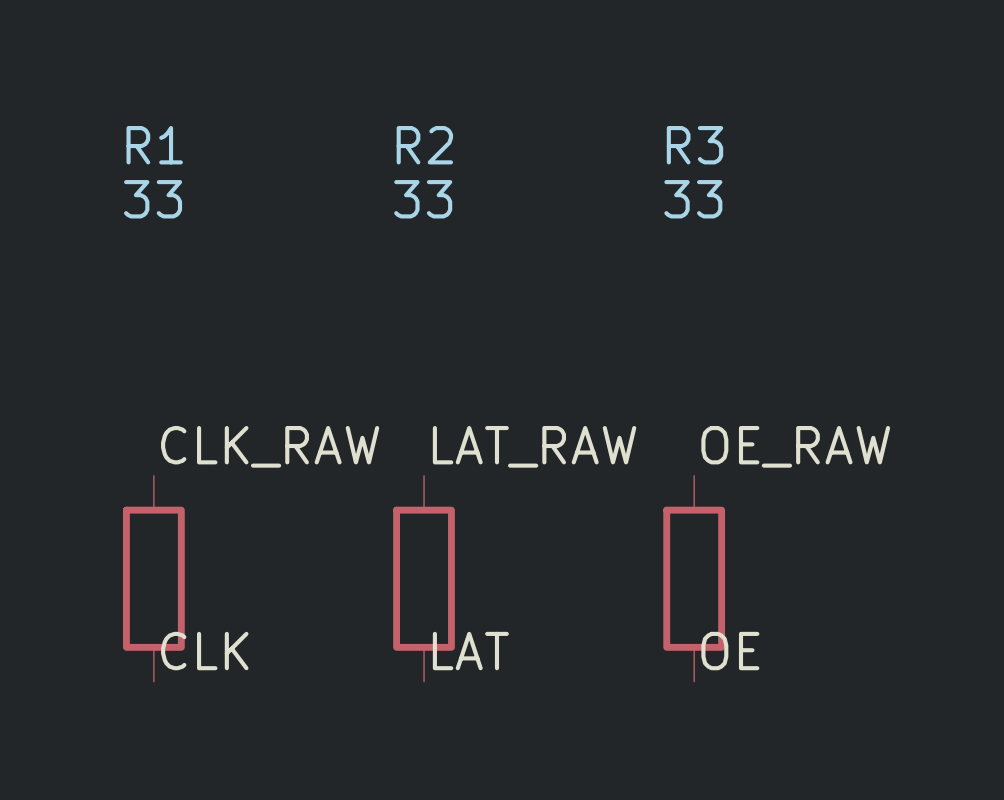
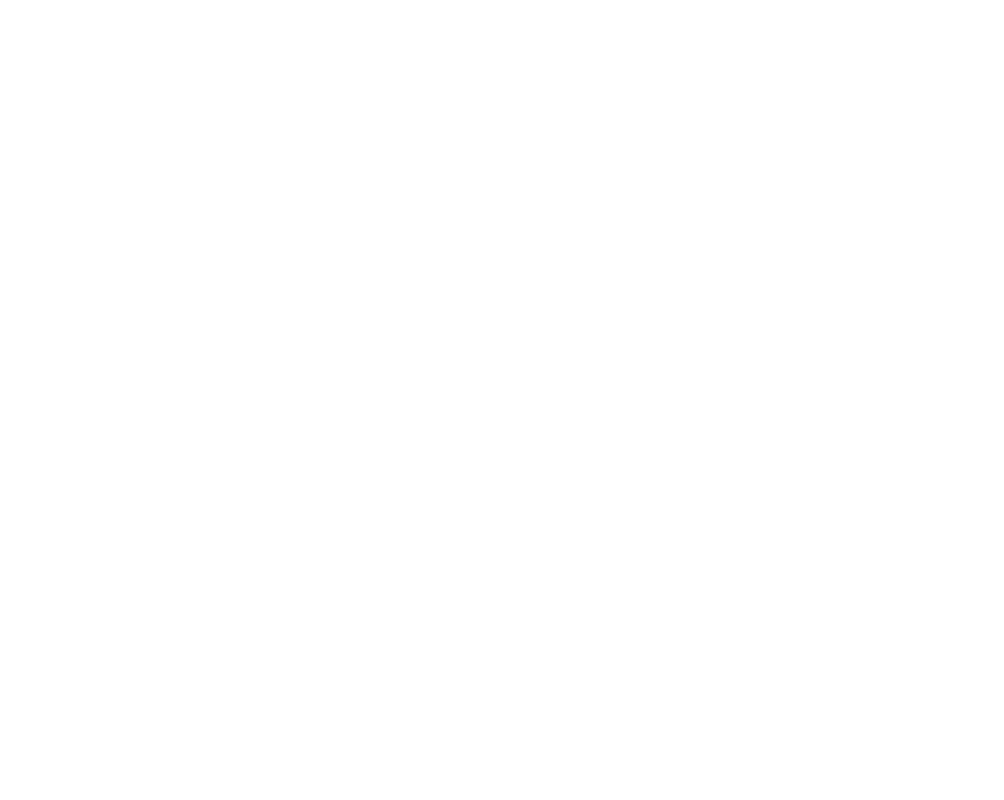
label: CLK_RAW (270, 446) -> none
label: LAT_RAW (534, 446) -> none
label: OE_RAW (795, 446) -> none
R1: 33 (153, 578) -> none
R2: 33 (424, 578) -> none
R3: 33 (694, 578) -> none
label: CLK (204, 651) -> none
label: LAT (470, 651) -> none
label: OE (730, 651) -> none

